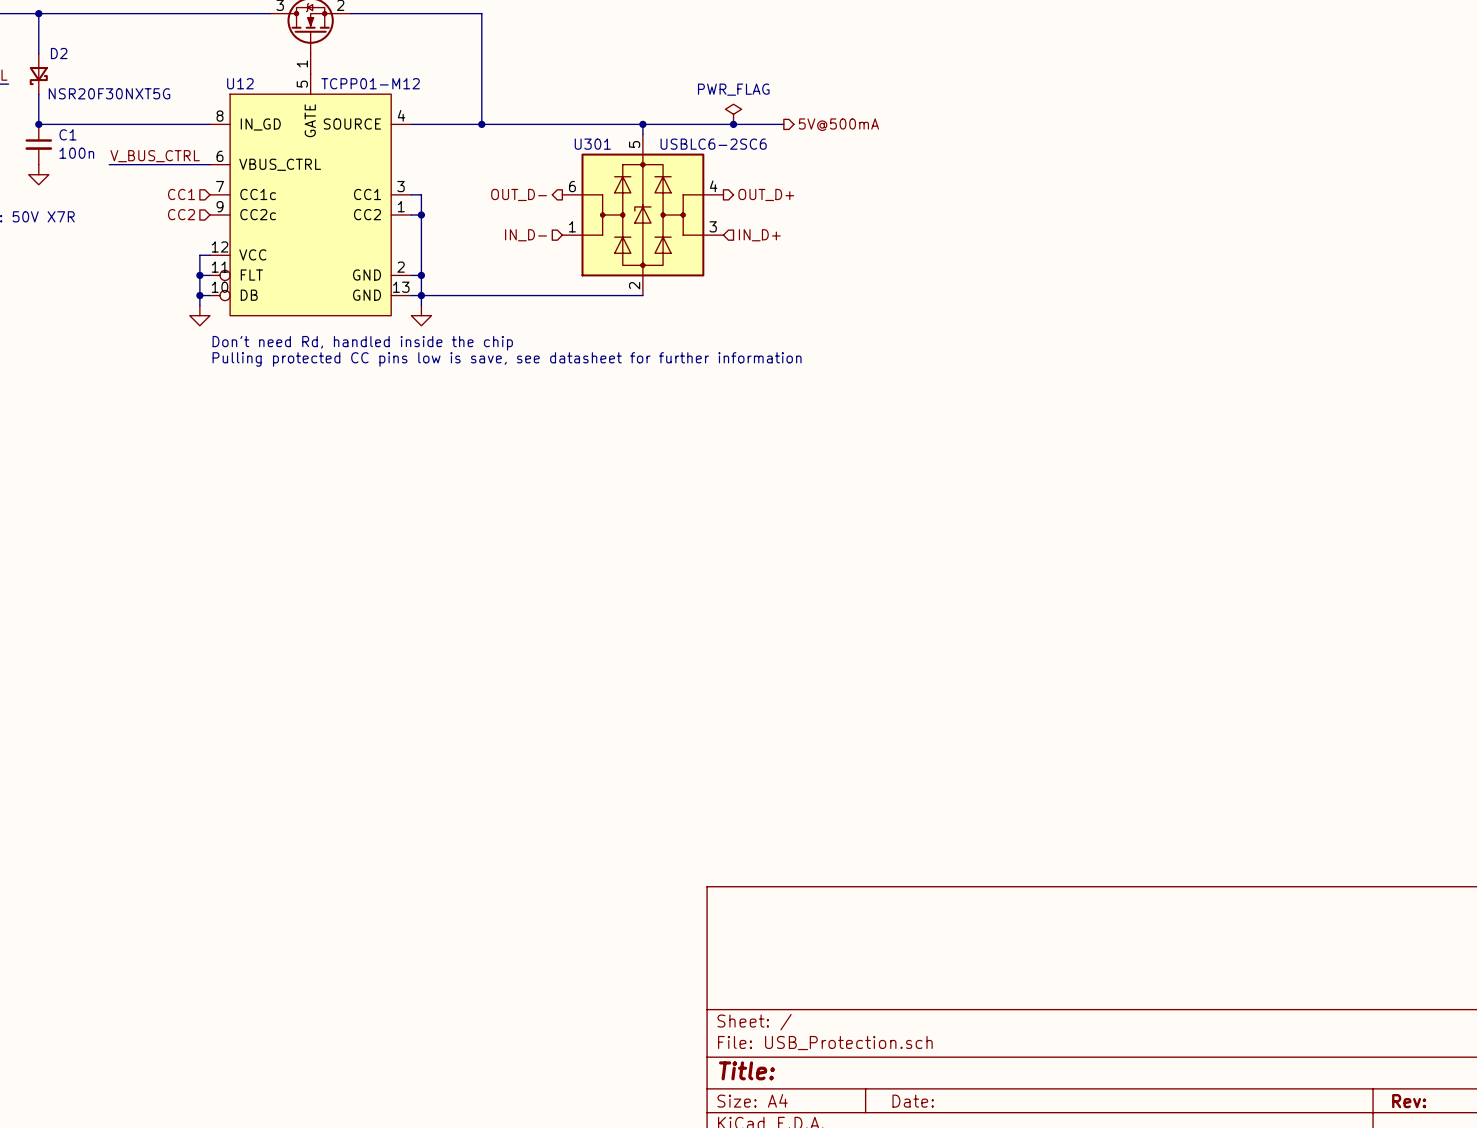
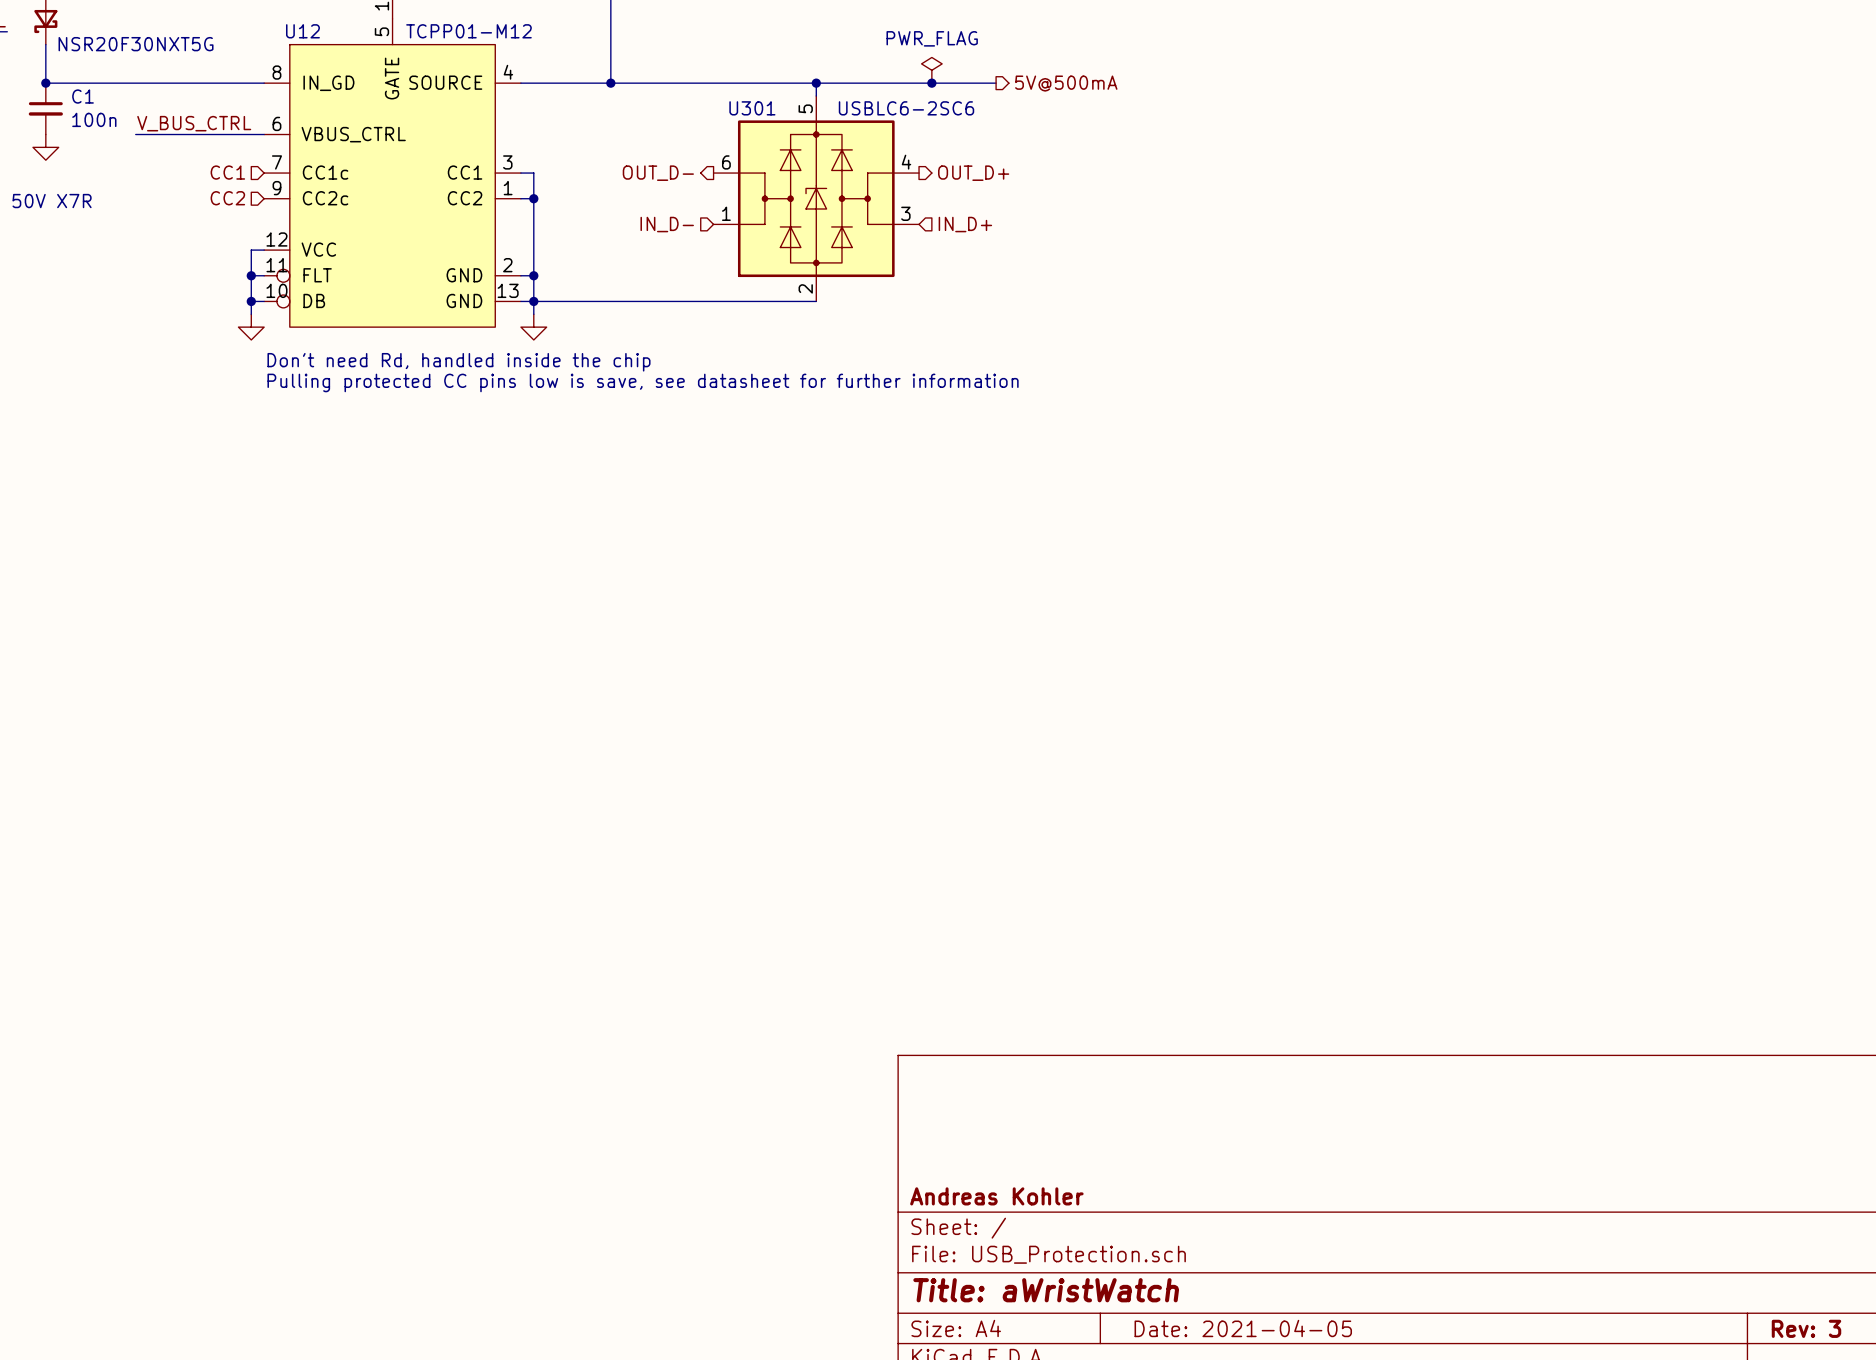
title block: none -> Andreas Kohler (996, 1196)
title block: Title: (746, 1070) -> Title: aWristWatch (1046, 1290)
title block: Date: (913, 1101) -> Date: 2021-04-05 (1243, 1328)
title block: Rev: (1409, 1101) -> Rev: 3 (1806, 1328)

